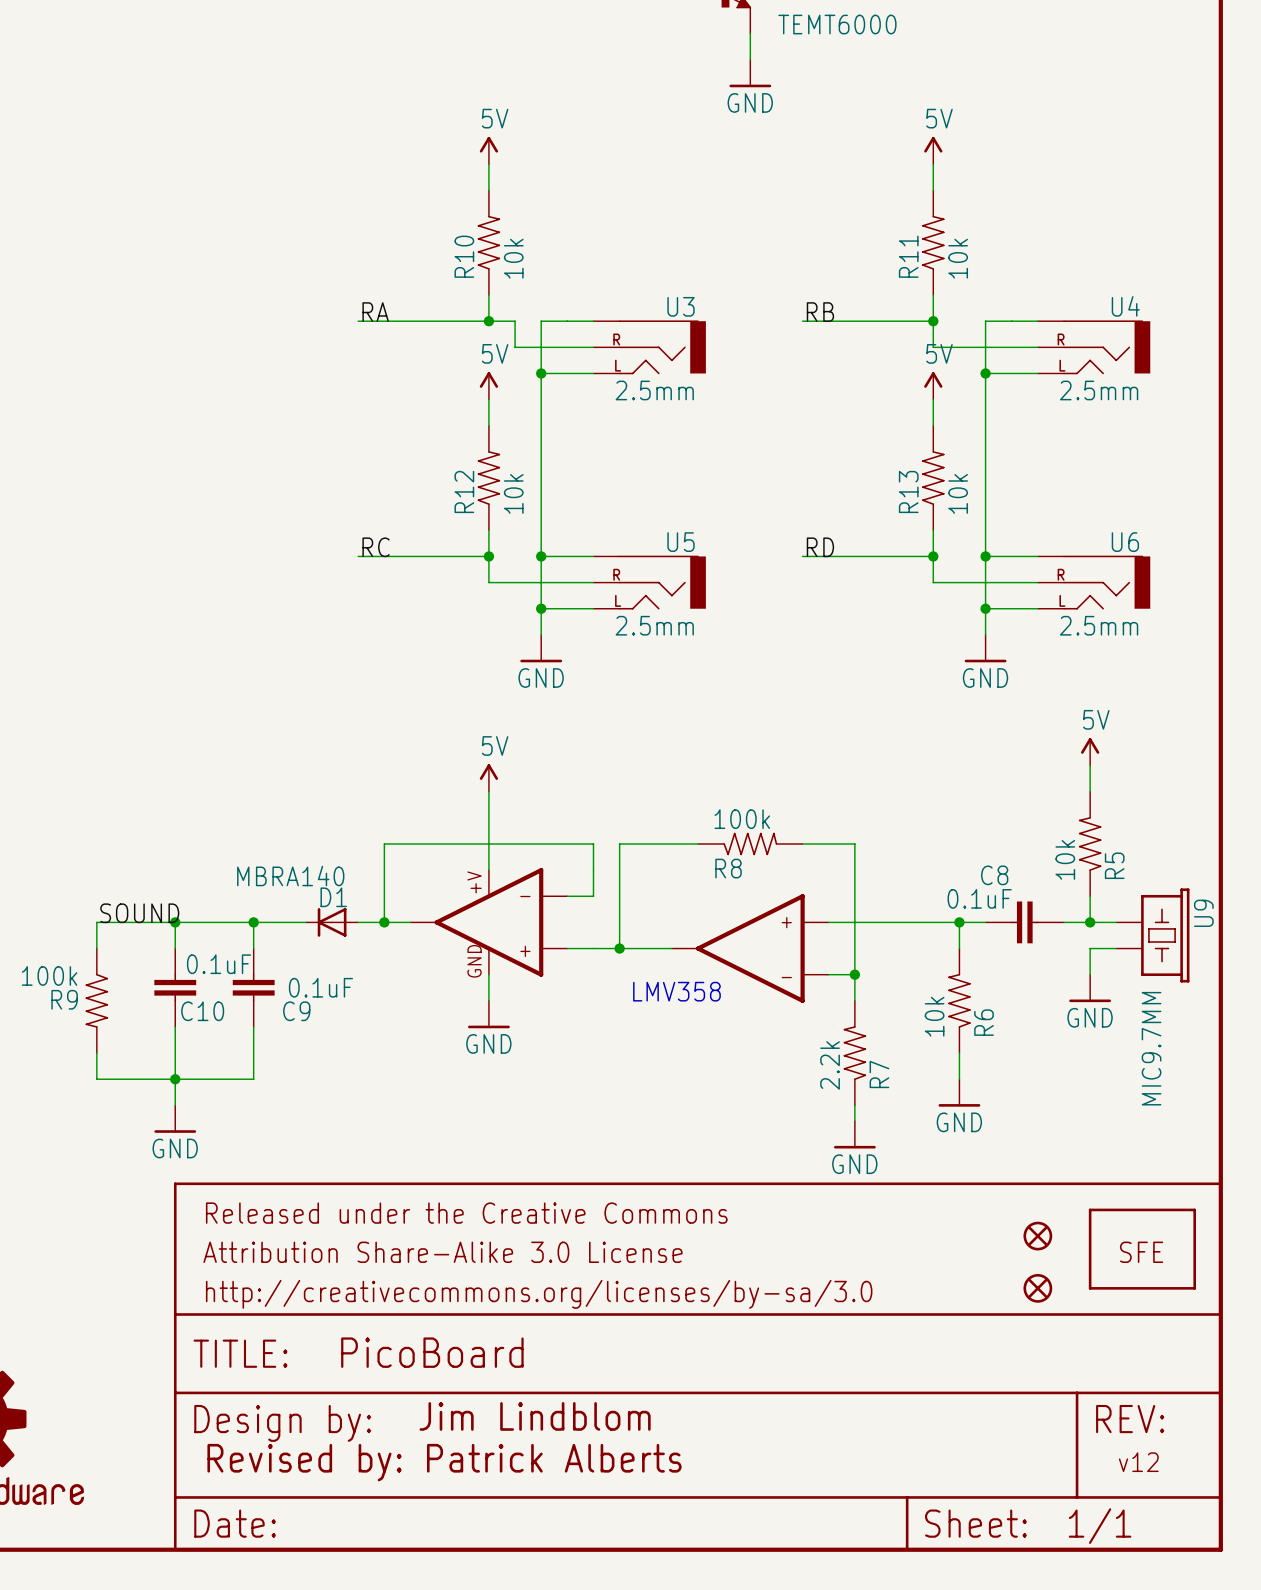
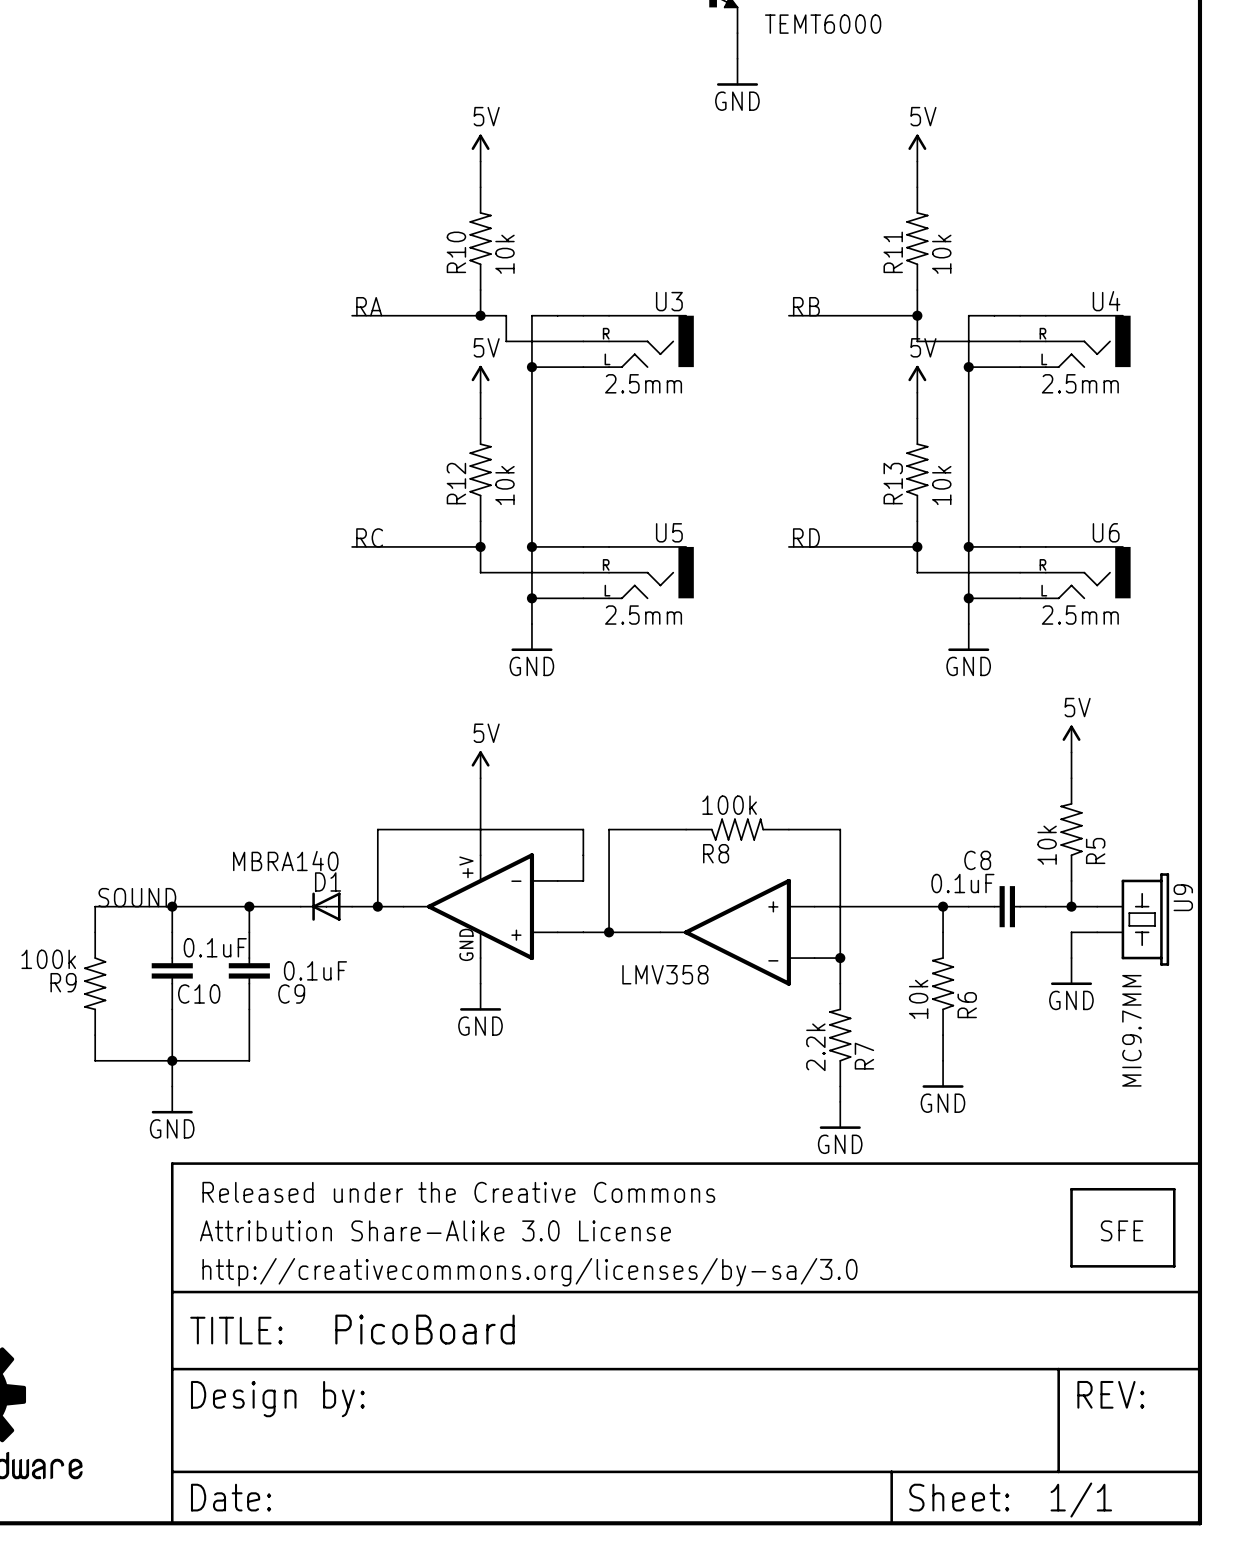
part: (1037, 1236) -> none
part: (1037, 1288) -> none
text: Jim Lindblom (535, 1416) -> none
text: Revised by: Patrick Alberts (444, 1462) -> none
text: v12 (1138, 1462) -> none

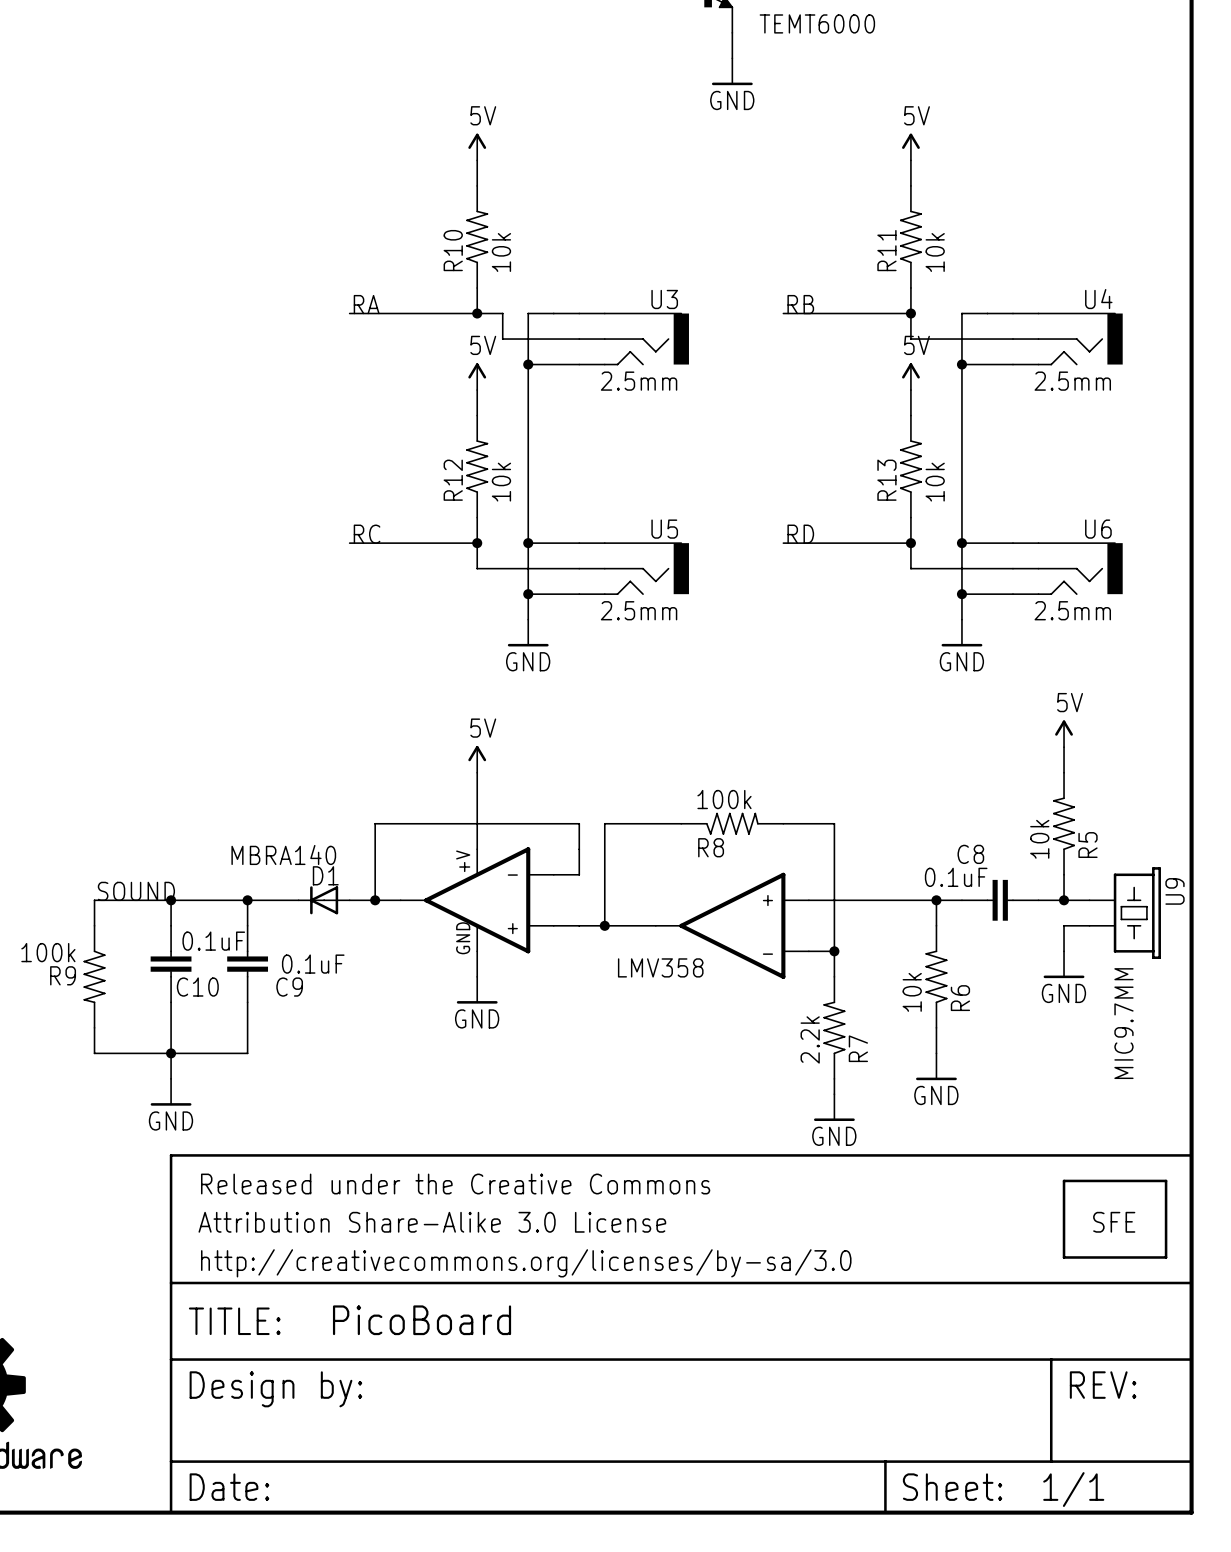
U3 text: R (606, 333) -> none
U4 text: R (1042, 333) -> none
U3 text: L (607, 359) -> none
U4 text: L (1044, 359) -> none
U5 text: R (606, 564) -> none
U6 text: R (1042, 564) -> none
U5 text: L (607, 590) -> none
U6 text: L (1044, 590) -> none

